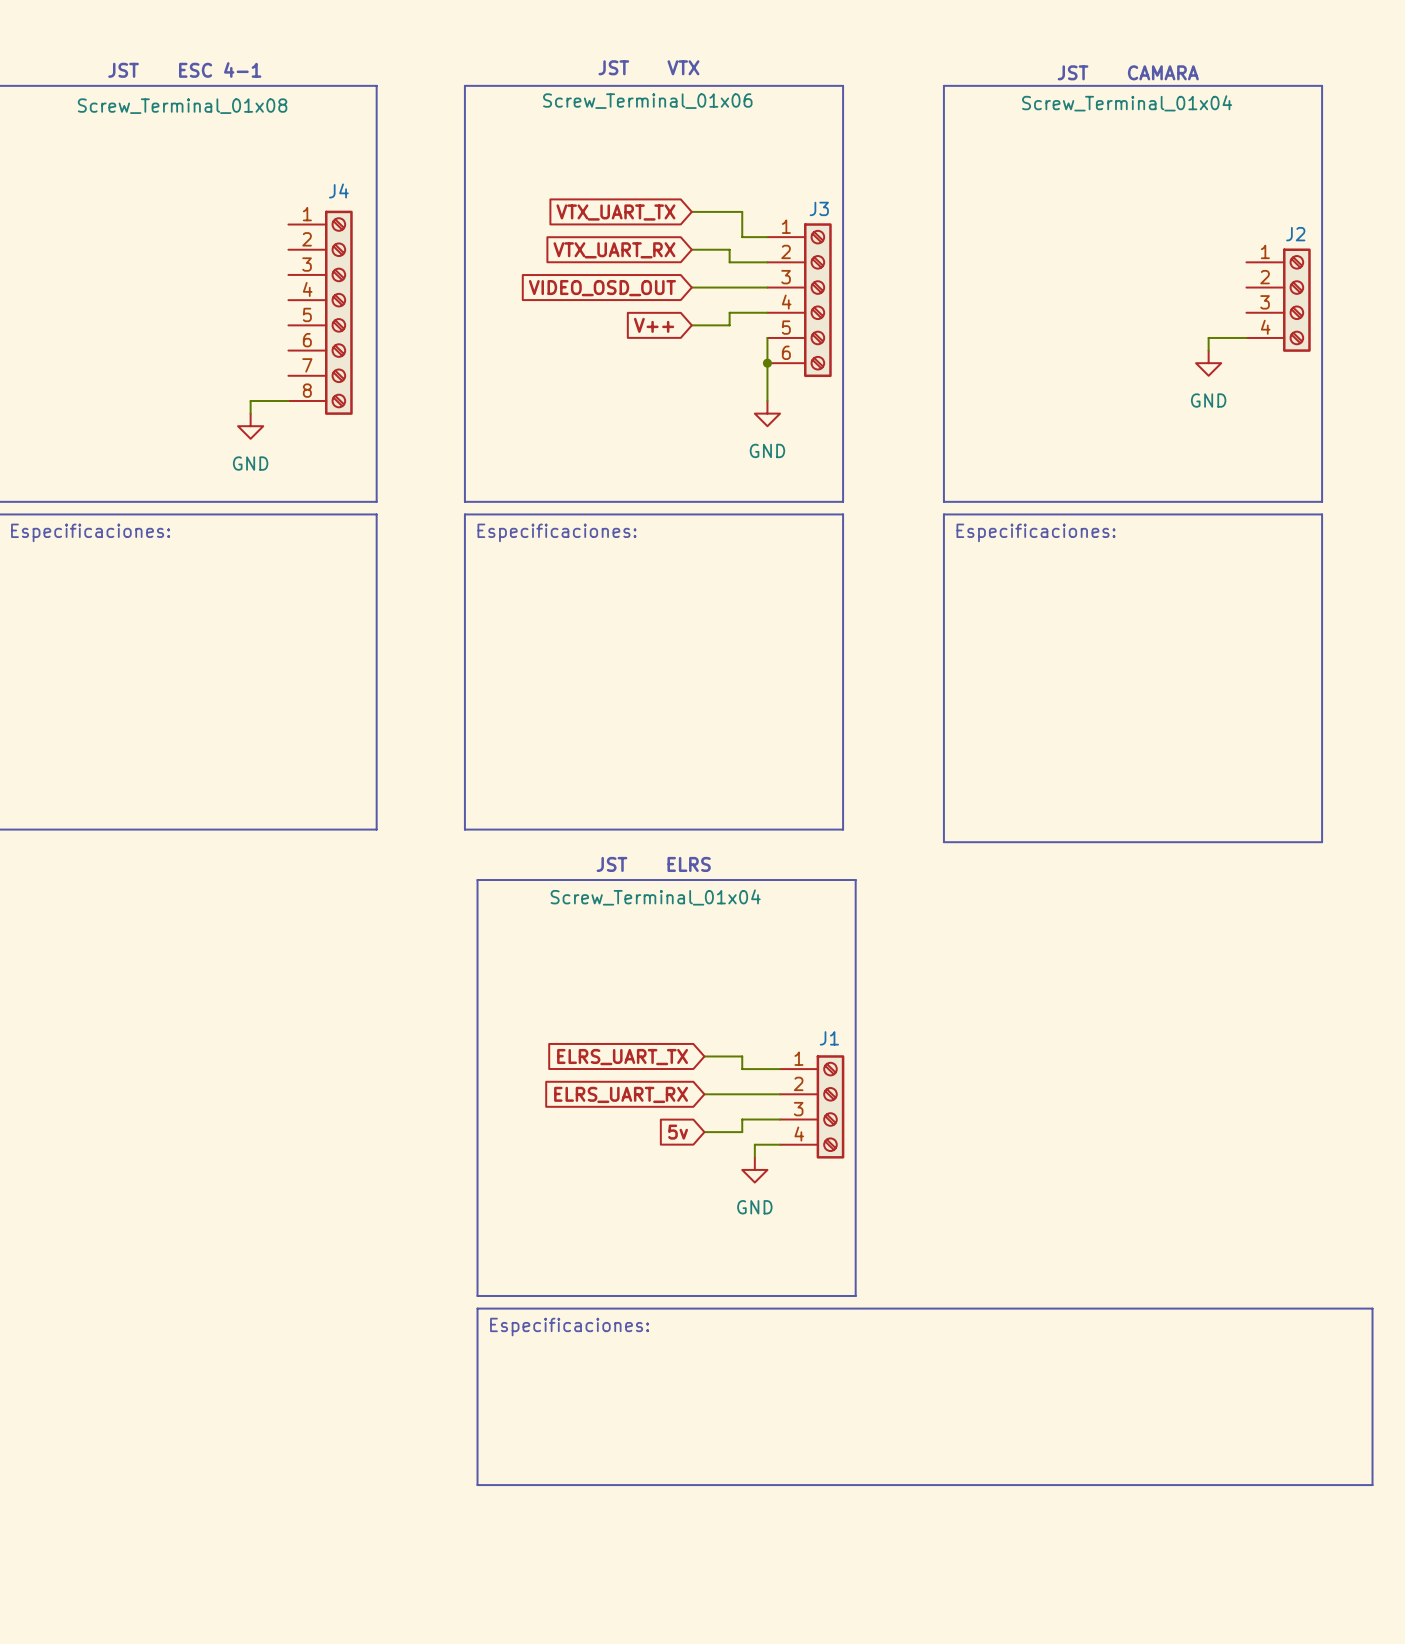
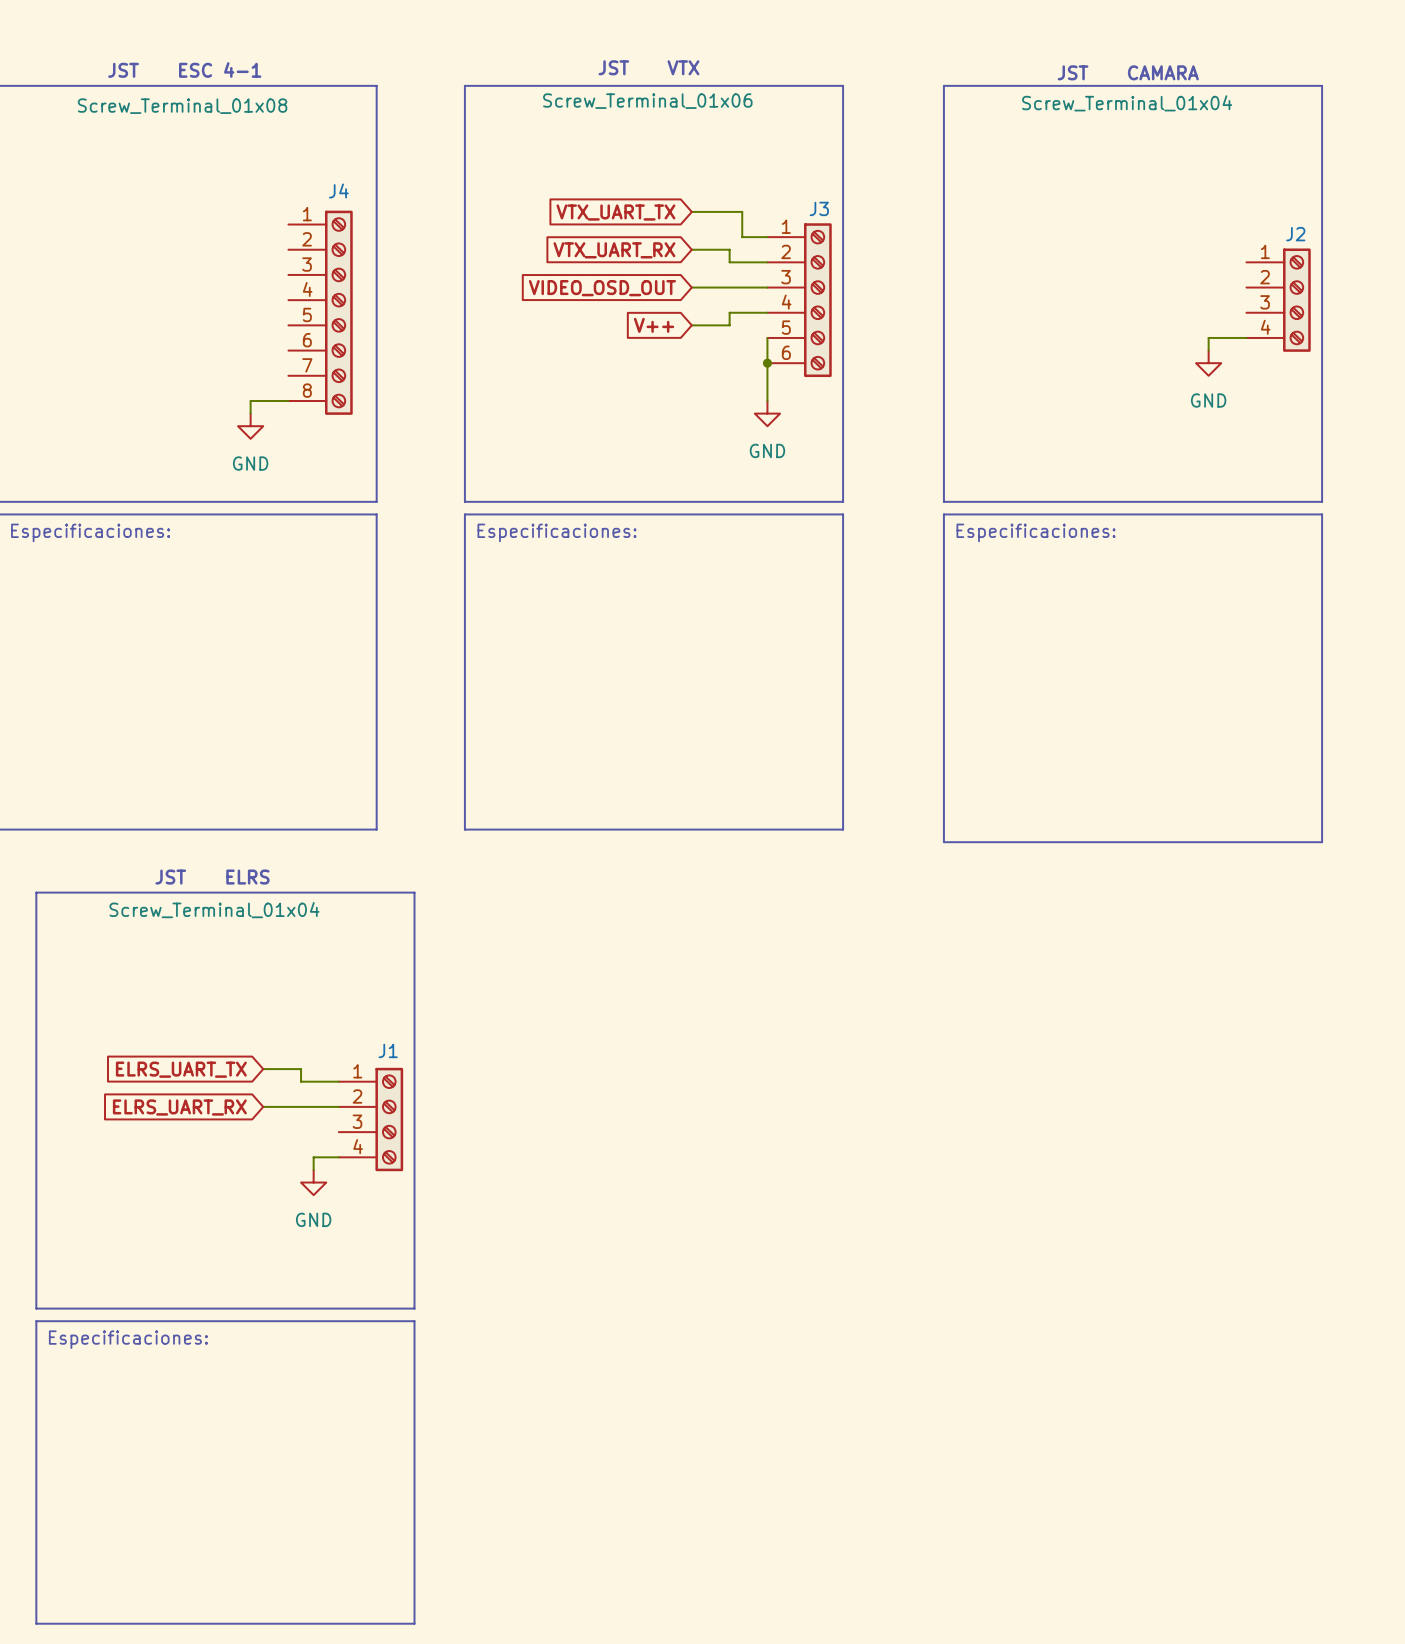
text: JST ELRS (653, 864) -> none
text: none -> JST ELRS (212, 877)
line: (477, 880) (855, 880) (855, 1295) (477, 1295) (477, 880) -> none
line: none -> (36, 892) (414, 892) (414, 1308) (36, 1308) (36, 892)
wire: (704, 1056) (742, 1056) (742, 1069) (780, 1069) -> none
global label: ELRS_UART_TX (622, 1057) -> none
global label: none -> ELRS_UART_TX (181, 1069)
wire: none -> (263, 1069) (301, 1069) (301, 1081) (338, 1081)
global label: ELRS_UART_RX (621, 1094) -> none
wire: (704, 1094) (780, 1094) -> none
wire: none -> (263, 1106) (338, 1106)
J1 position: (812, 1106) -> (371, 1119)
global label: none -> ELRS_UART_RX (179, 1107)
wire: (780, 1119) (742, 1119) (742, 1132) (704, 1132) -> none
global label: 5v (678, 1132) -> none
wire: (780, 1144) (754, 1144) (754, 1157) -> none
wire: none -> (338, 1157) (313, 1157) (313, 1169)
power symbol: GND (754, 1169) -> none
power symbol: none -> GND (313, 1182)
line: (477, 1308) (477, 1485) (1372, 1485) (1372, 1308) (477, 1308) -> none
line: none -> (36, 1321) (36, 1623) (414, 1623) (414, 1321) (36, 1321)
text: Especificaciones: (569, 1327) -> none
text: none -> Especificaciones: (128, 1339)

